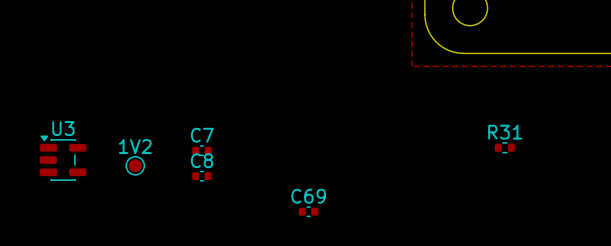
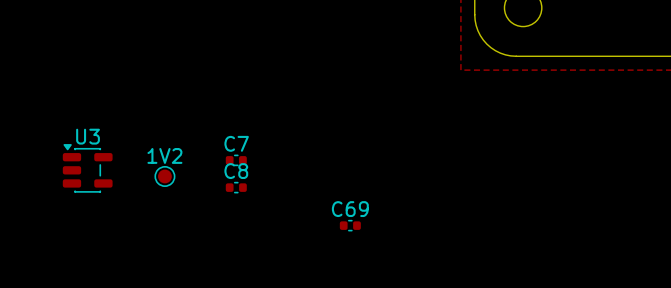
R31: (504, 147) -> none

